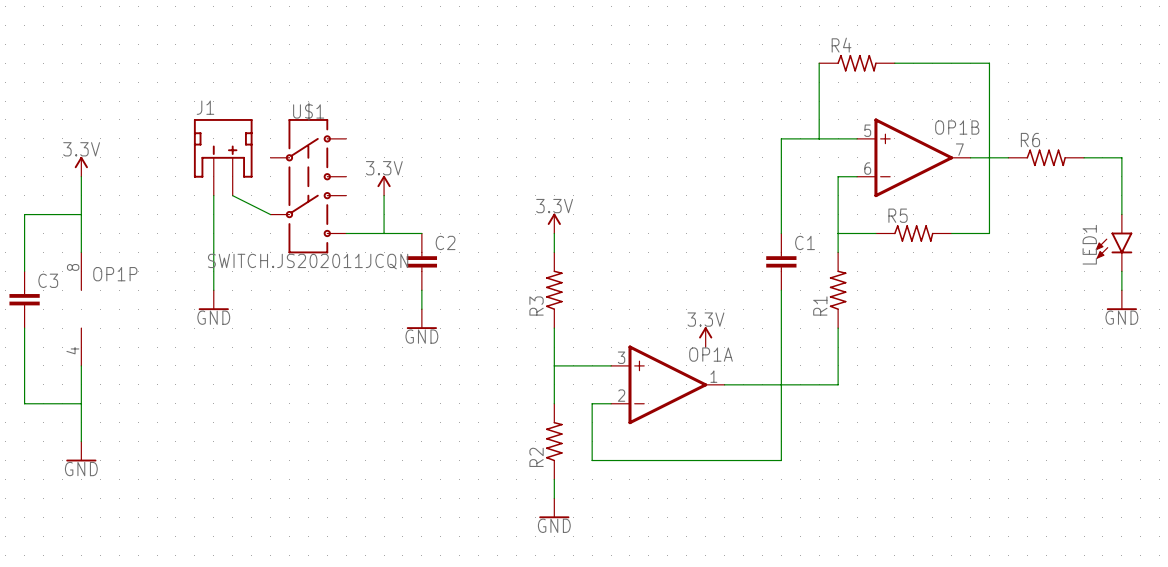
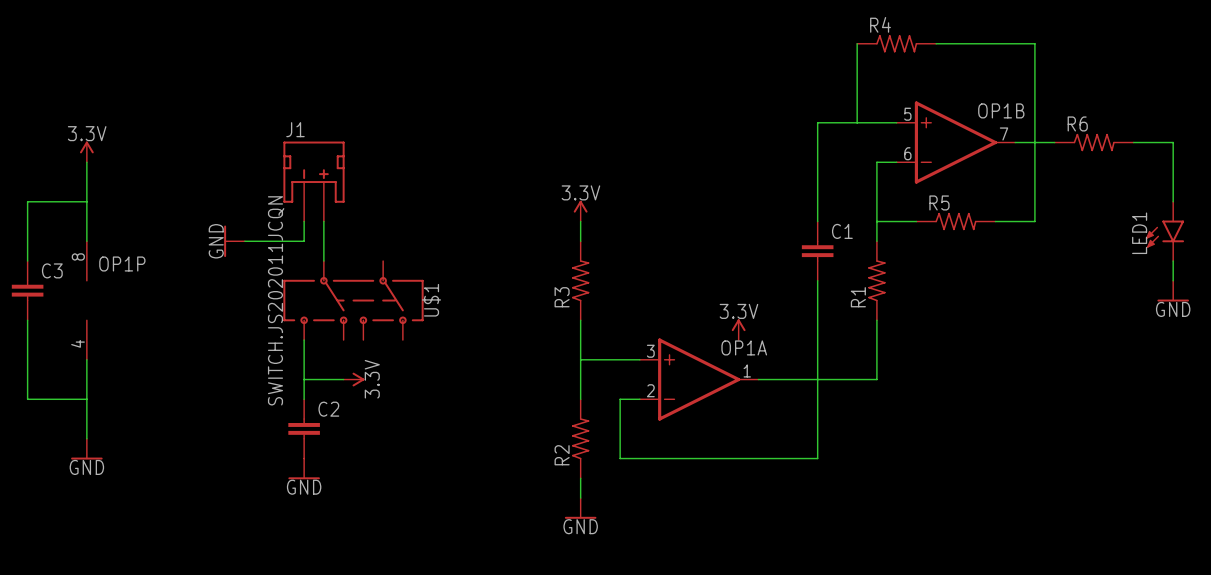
J1 position: (223, 157) -> (314, 181)
power symbol: 3.3V (384, 185) -> none
U$1 rotation: 0° (308, 186) -> 90° clockwise (353, 300)
U$1 position: (308, 186) -> (353, 300)
wire: (213, 195) (213, 290) -> none
wire: (232, 195) (270, 214) -> none
wire: (384, 195) (384, 233) -> (323, 221) (323, 261)
wire: none -> (304, 221) (304, 241) (244, 241)
wire: (346, 233) (421, 233) -> none
C2 position: (421, 261) -> (304, 428)
wire: (421, 290) (421, 309) -> none
power symbol position: GND (213, 300) -> GND (234, 241)
power symbol rotation: 0° (213, 309) -> 90° clockwise (225, 241)
power symbol: GND (421, 319) -> none
wire: none -> (304, 340) (304, 399)
wire: none -> (304, 379) (343, 379)
power symbol: none -> 3.3V (354, 379)
power symbol: none -> GND (304, 468)

